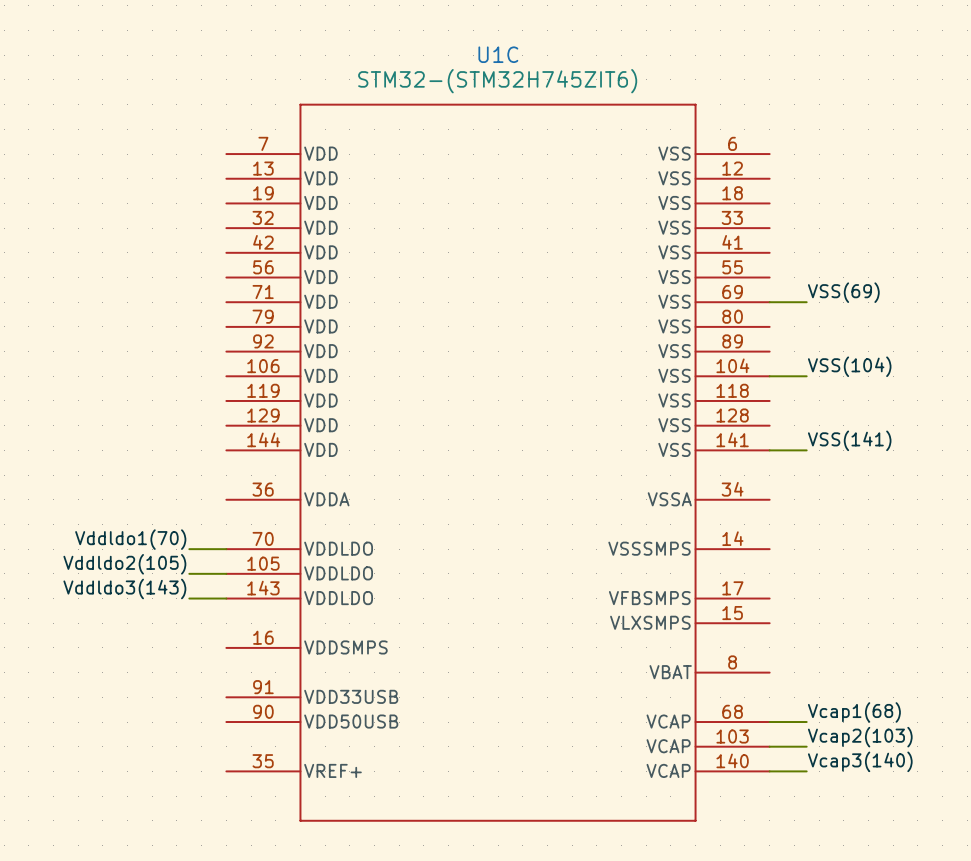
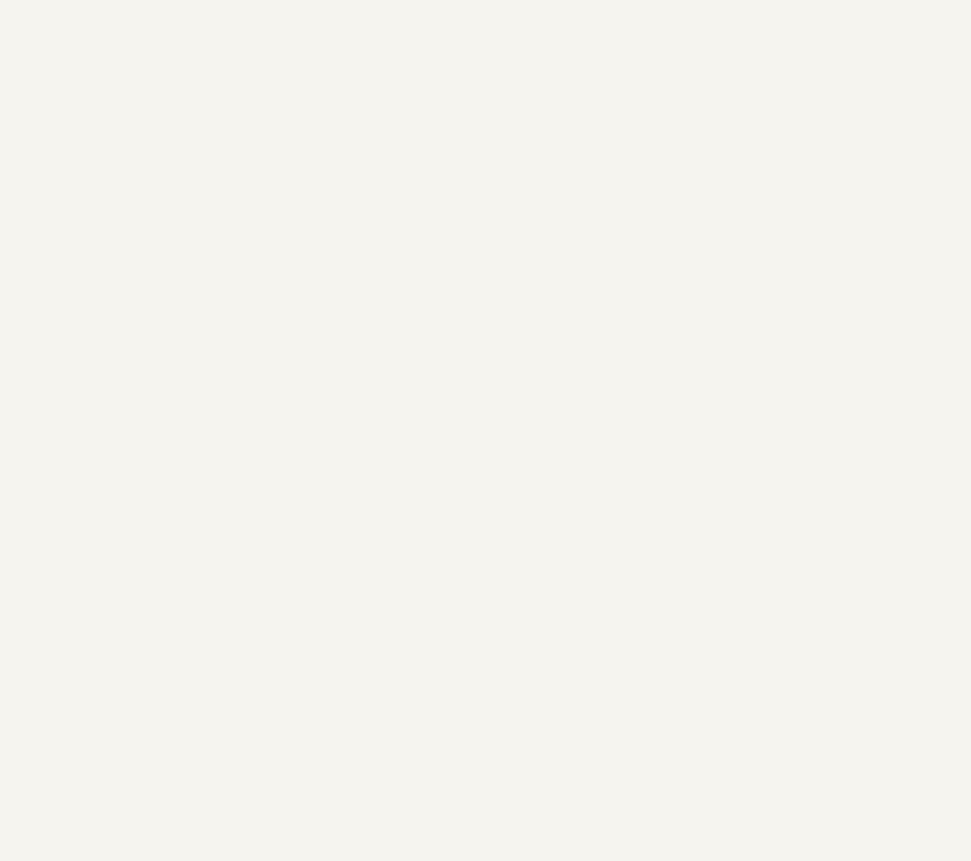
label: VSS(69) (843, 292) -> none
wire: (769, 302) (806, 302) -> none
label: VSS(104) (849, 366) -> none
wire: (769, 376) (806, 376) -> none
label: VSS(141) (849, 440) -> none
wire: (769, 450) (806, 450) -> none
U1C: STM32-(STM32H745ZIT6) (498, 462) -> none
label: Vddldo1(70) (130, 539) -> none
wire: (189, 549) (226, 549) -> none
label: Vddldo2(105) (124, 564) -> none
wire: (189, 573) (226, 573) -> none
label: Vddldo3(143) (124, 588) -> none
wire: (189, 598) (226, 598) -> none
label: Vcap1(68) (854, 712) -> none
wire: (769, 722) (806, 722) -> none
label: Vcap2(103) (860, 737) -> none
wire: (769, 746) (806, 746) -> none
label: Vcap3(140) (860, 761) -> none
wire: (769, 771) (806, 771) -> none

